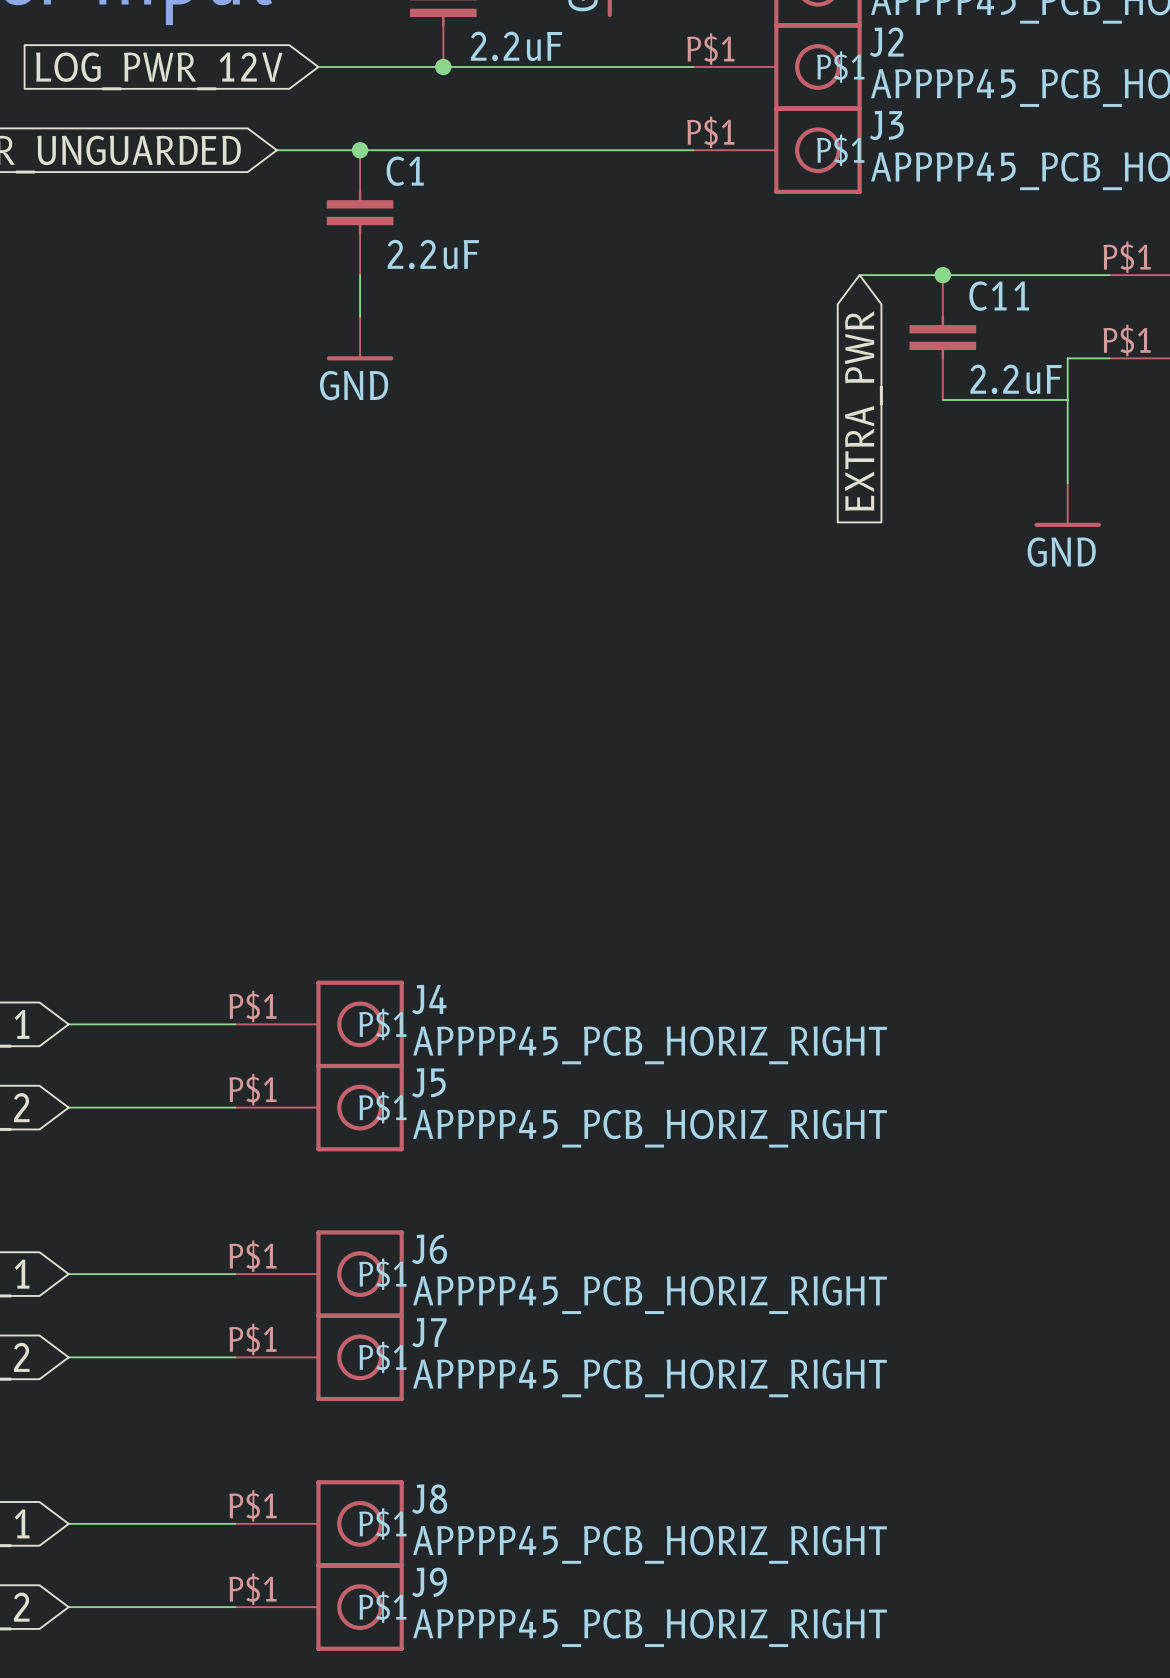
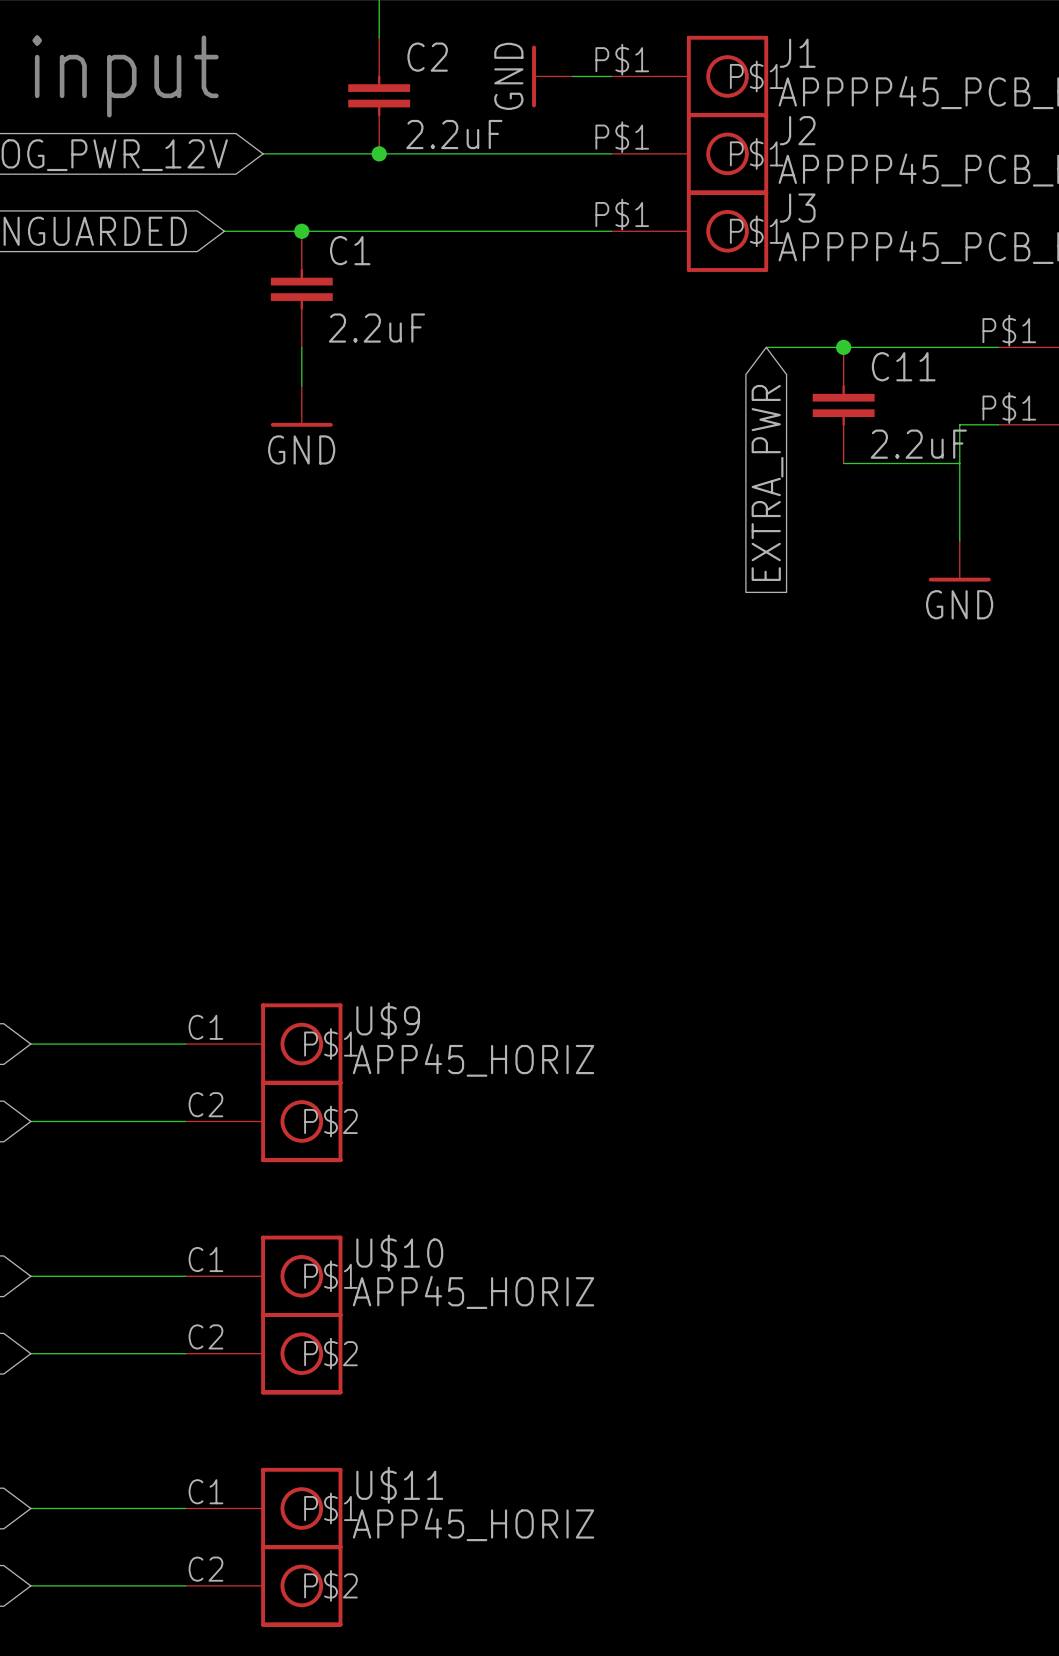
J4: APPPP45_PCB_HORIZ_RIGHT (319, 1024) -> none
U$9: none -> APP45_HORIZ (264, 1082)
J5: APPPP45_PCB_HORIZ_RIGHT (319, 1107) -> none
J6: APPPP45_PCB_HORIZ_RIGHT (319, 1274) -> none
U$10: none -> APP45_HORIZ (264, 1314)
J7: APPPP45_PCB_HORIZ_RIGHT (319, 1357) -> none
J8: APPPP45_PCB_HORIZ_RIGHT (319, 1523) -> none
U$11: none -> APP45_HORIZ (264, 1547)
J9: APPPP45_PCB_HORIZ_RIGHT (319, 1607) -> none

